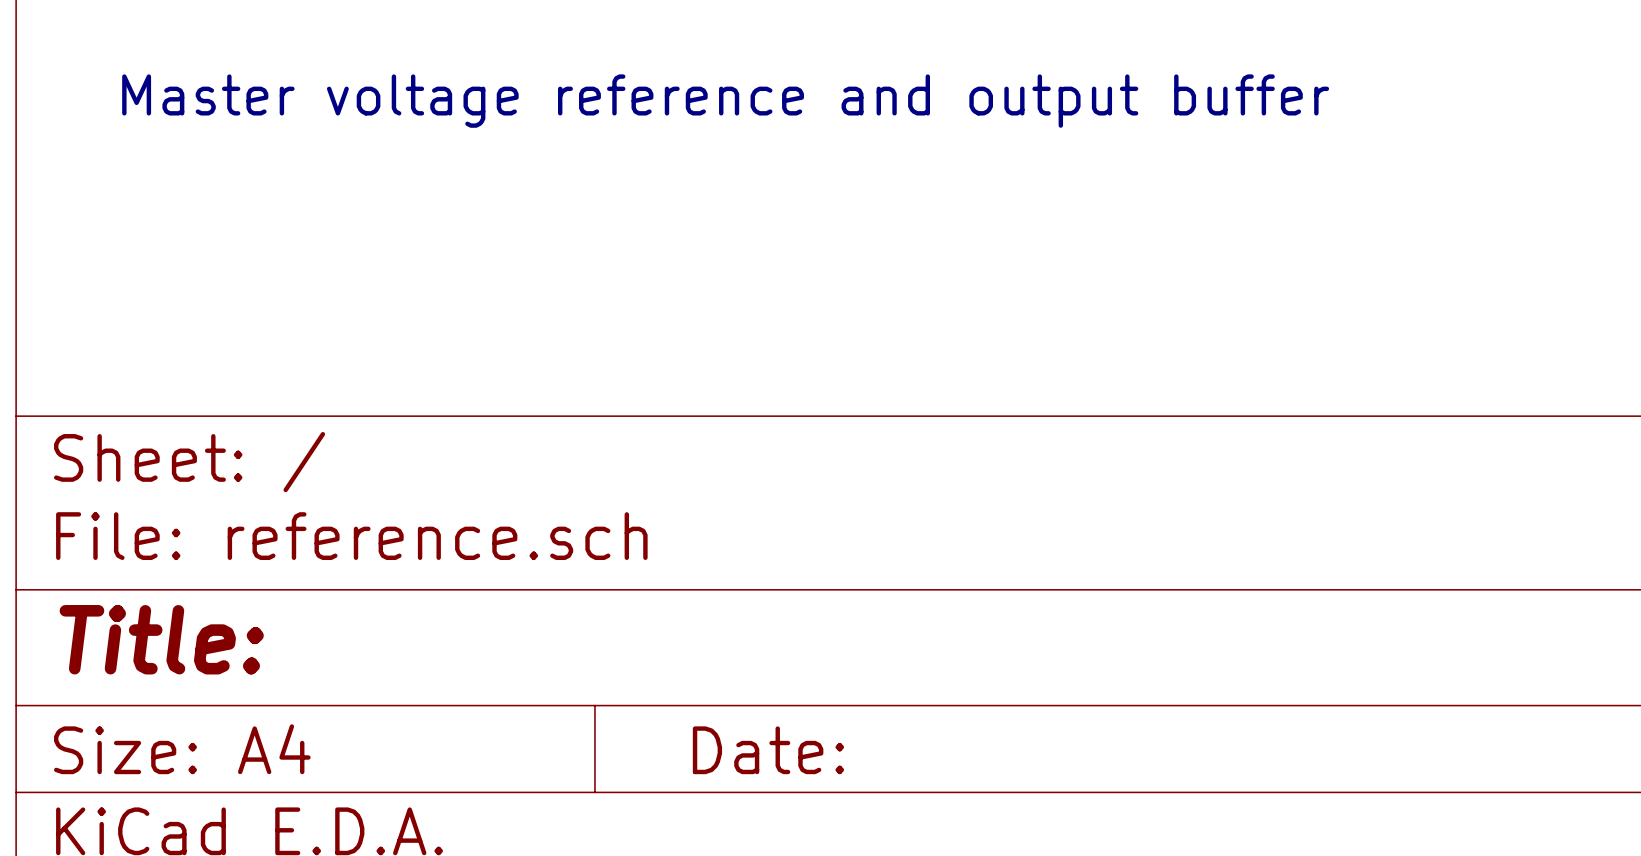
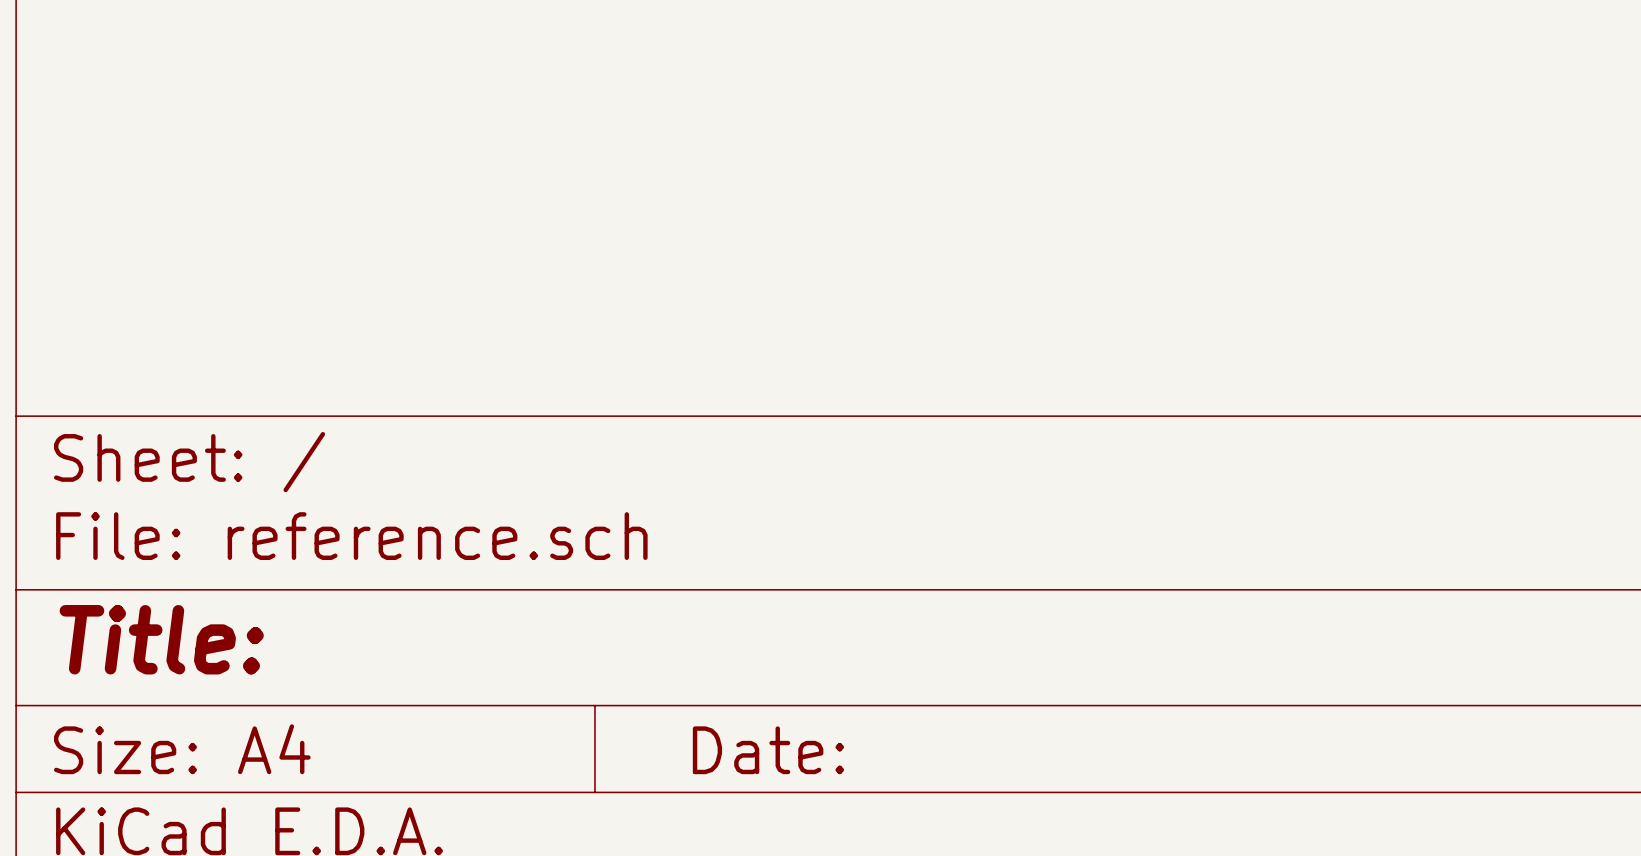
text: Master voltage reference and output buffer (725, 101) -> none

